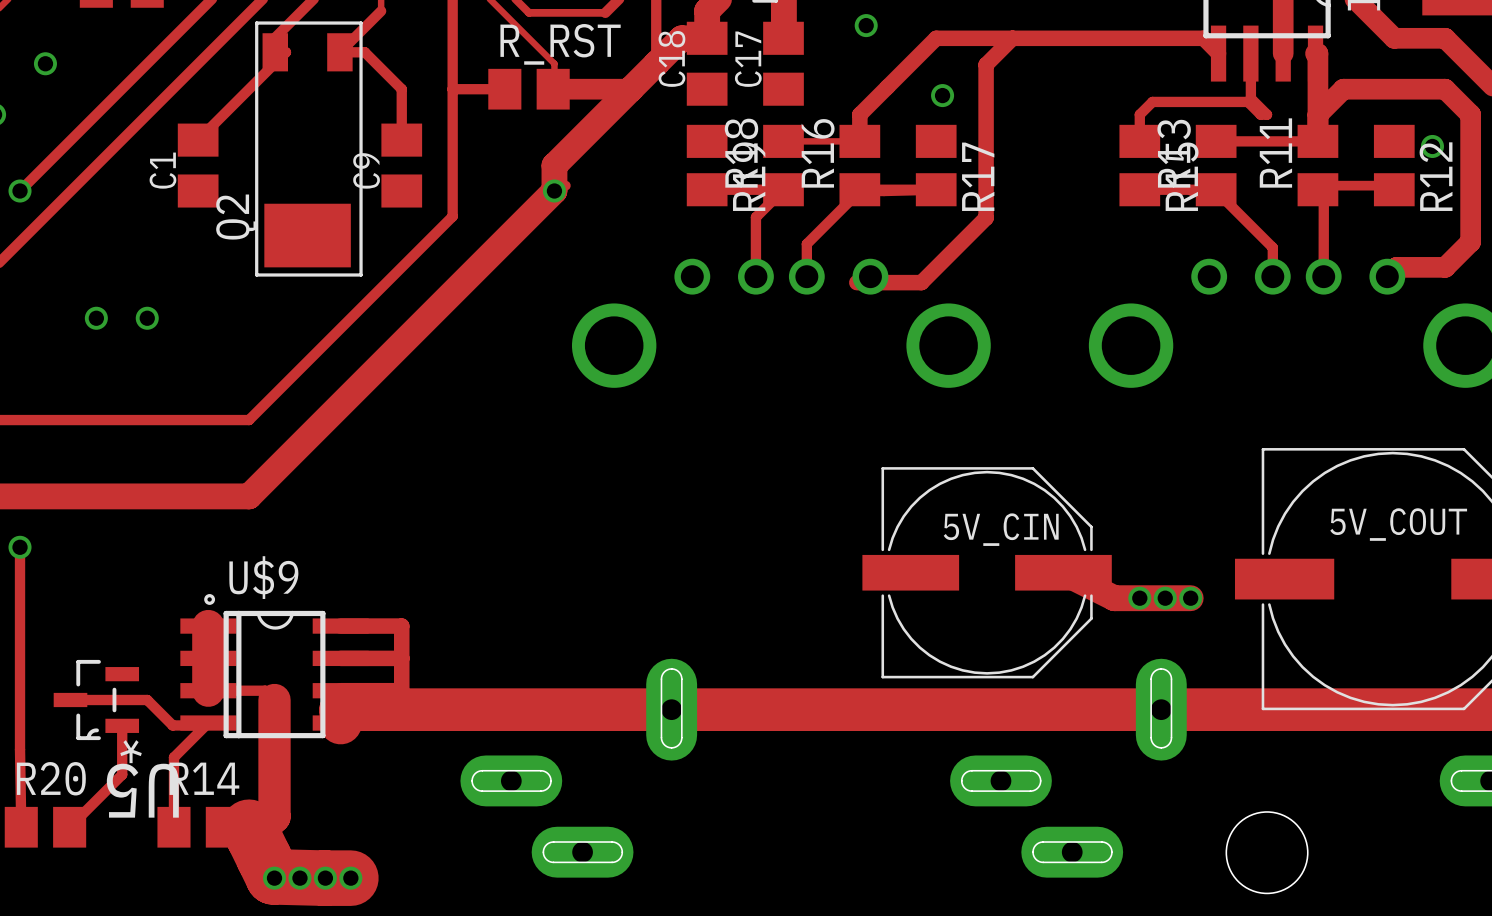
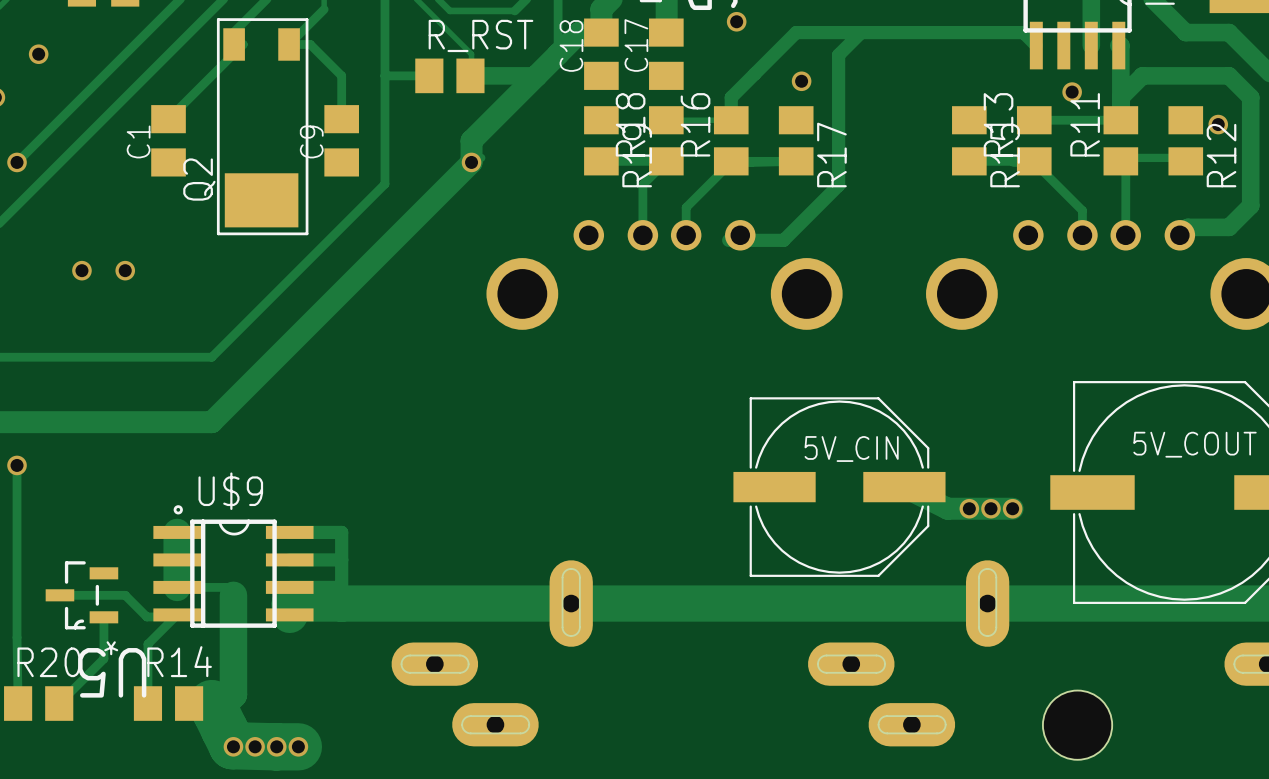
track: (1250, 53) (1250, 98) (1267, 114) (1260, 114) (1247, 101) (1152, 101) (1139, 114) (1139, 141) -> none
via: none -> (1072, 92)

